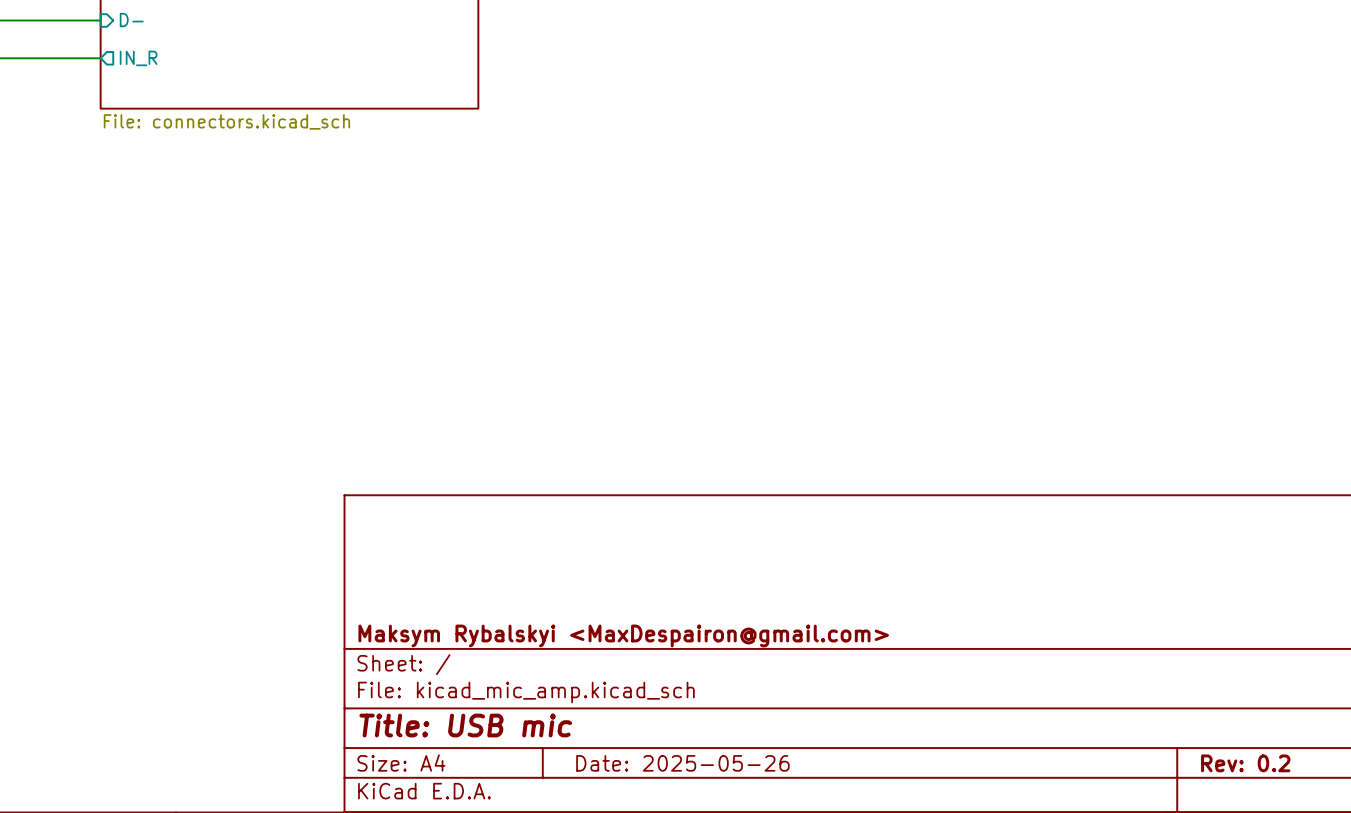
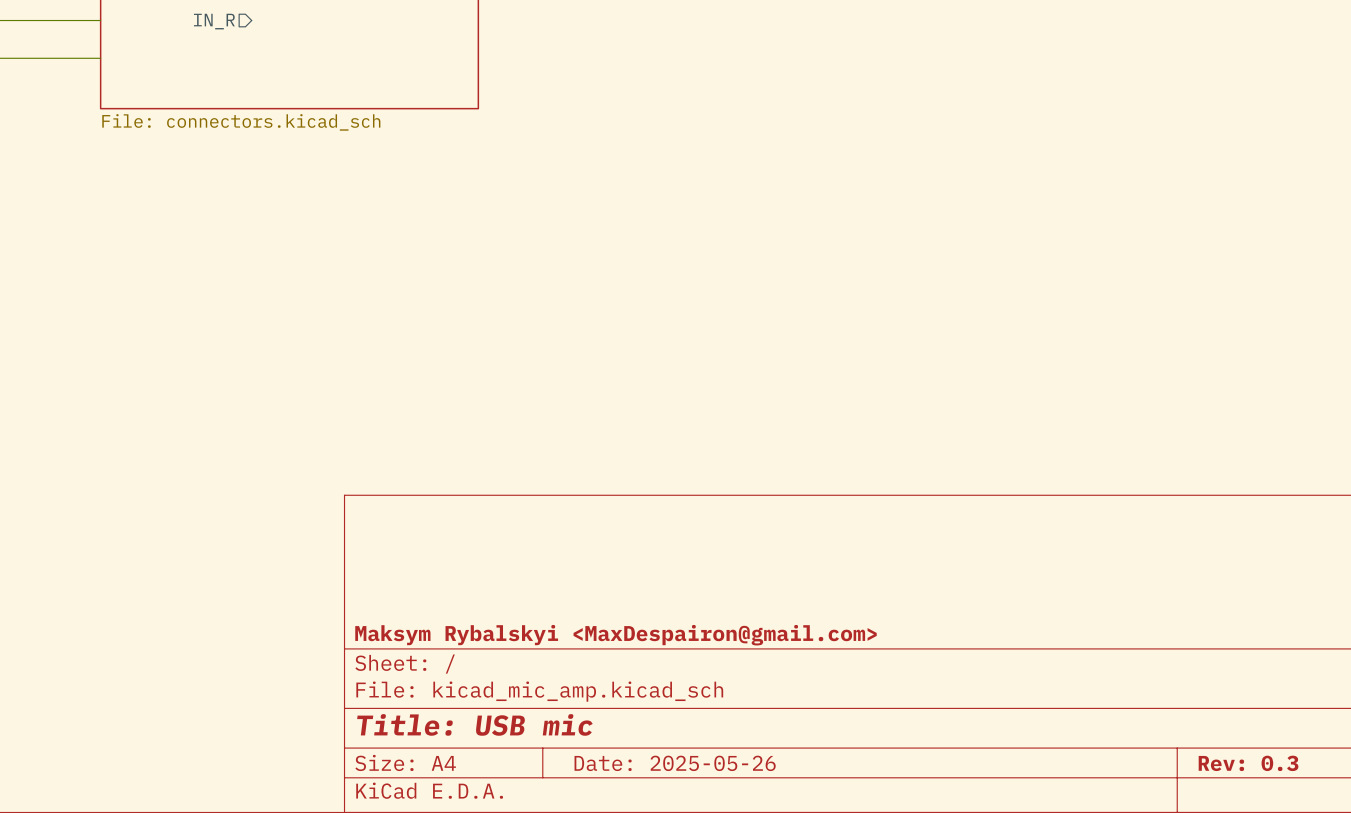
sheet pin: D- (131, 20) -> none
sheet pin rotation: 0° (138, 58) -> 180° (214, 21)
sheet pin position: IN_R (138, 58) -> IN_R (214, 21)
title block: Rev: 0.2 (1245, 763) -> Rev: 0.3 (1248, 763)

